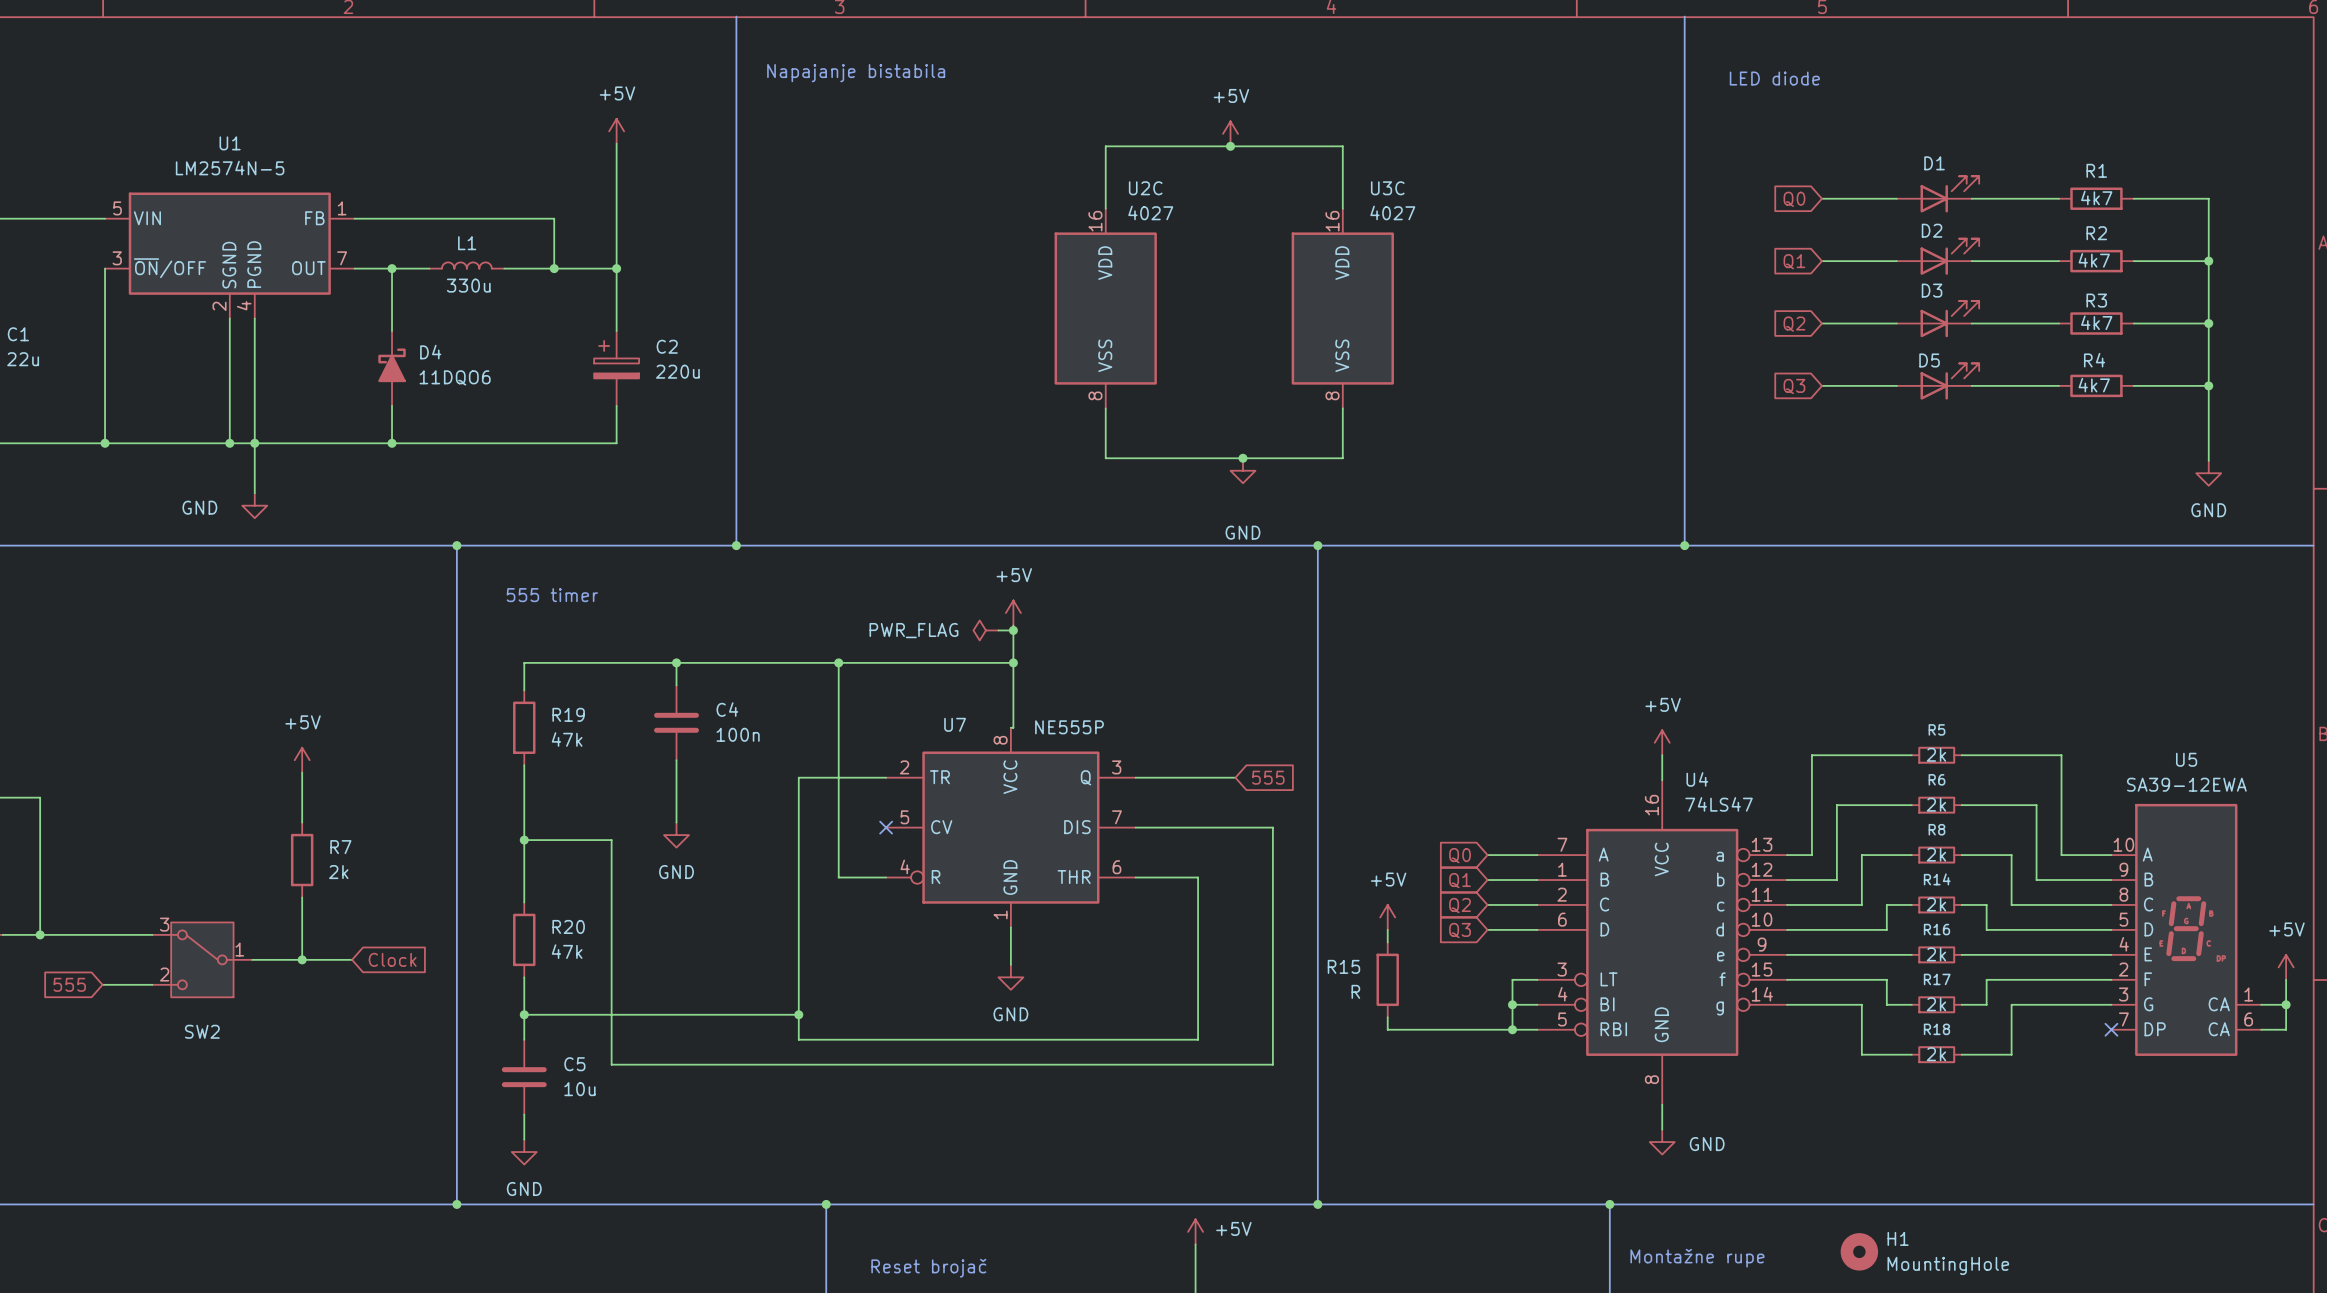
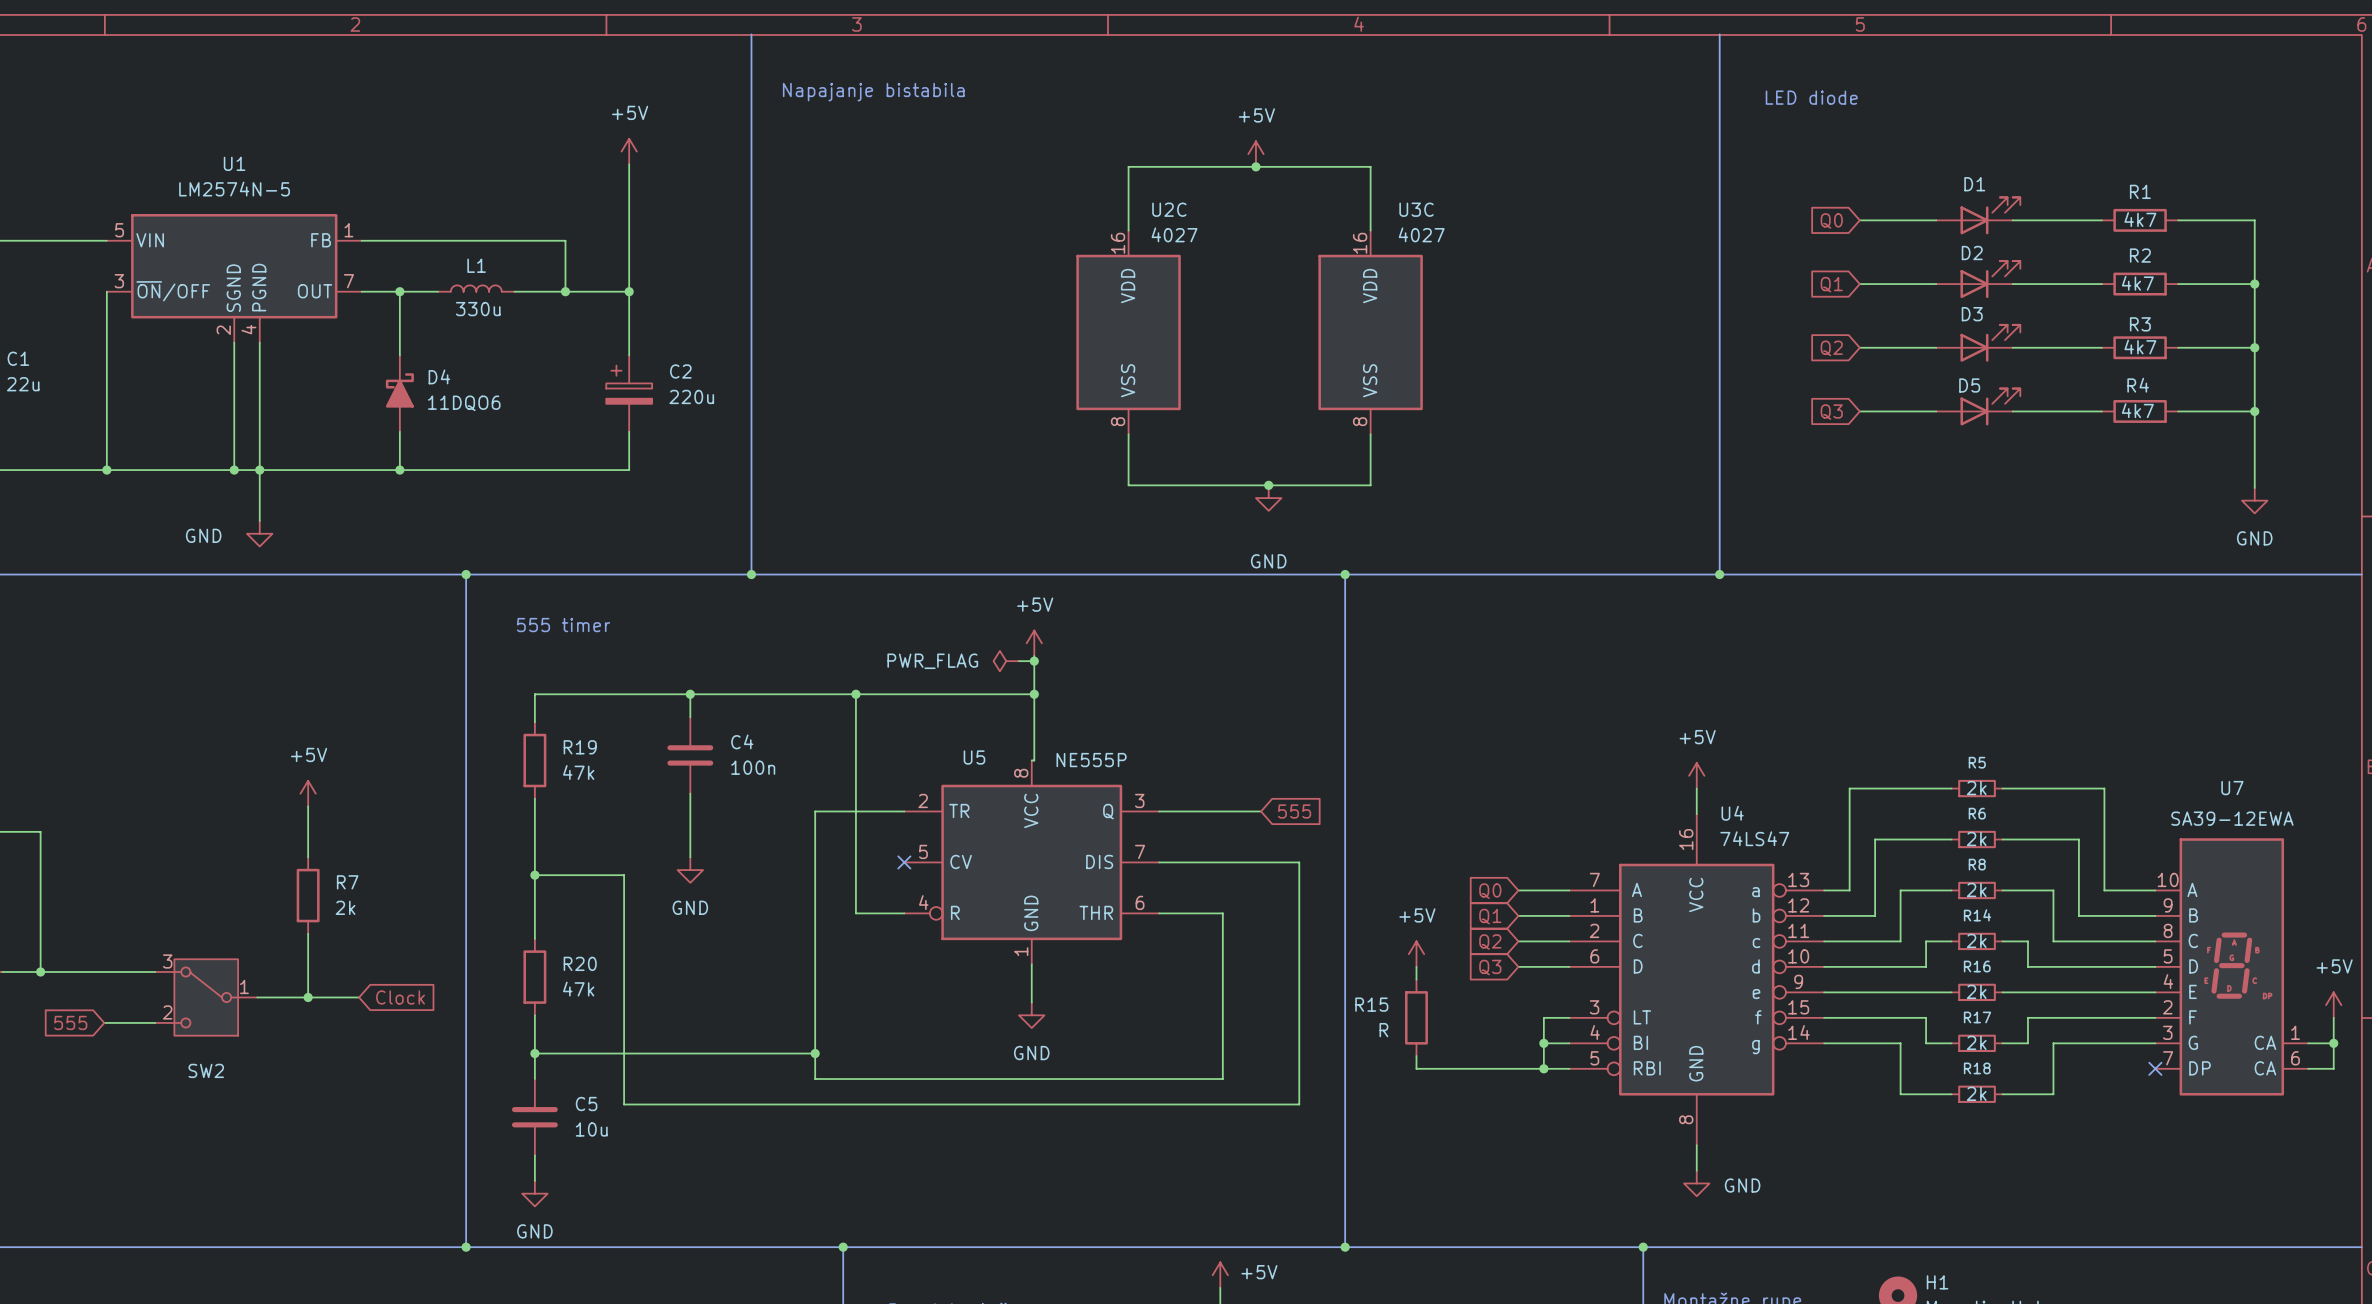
U7 name: U7 (955, 724) -> U5 (974, 757)
U5 name: U5 (2186, 759) -> U7 (2232, 788)

